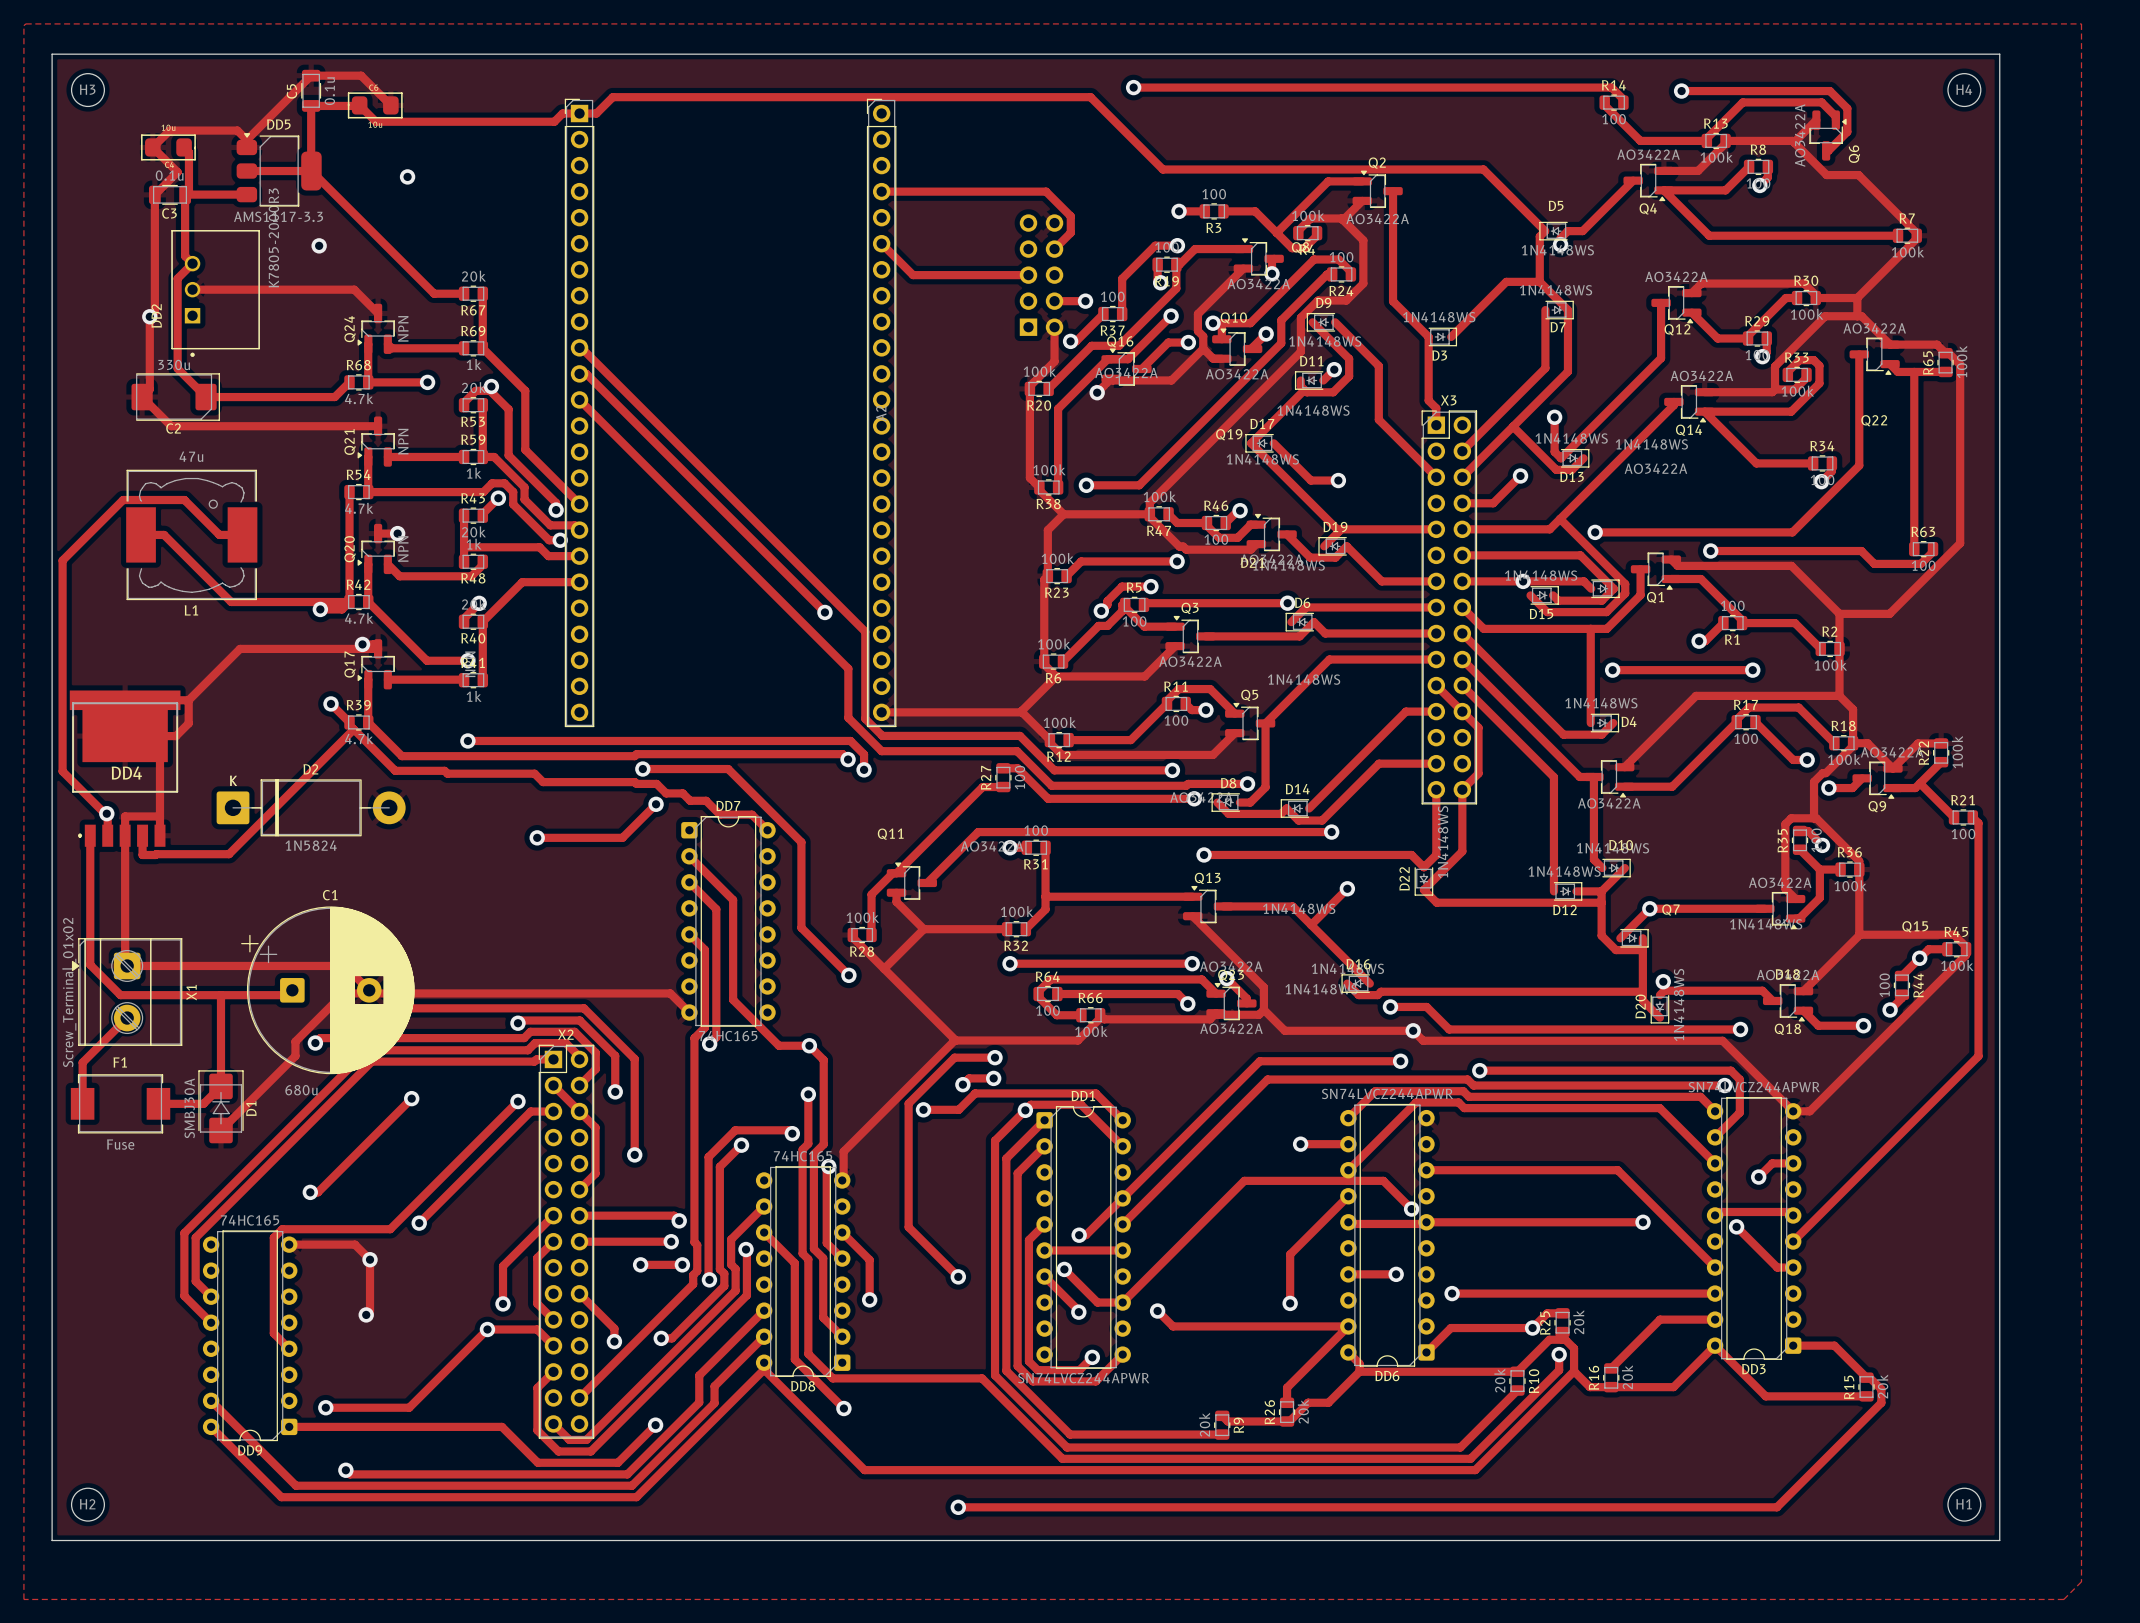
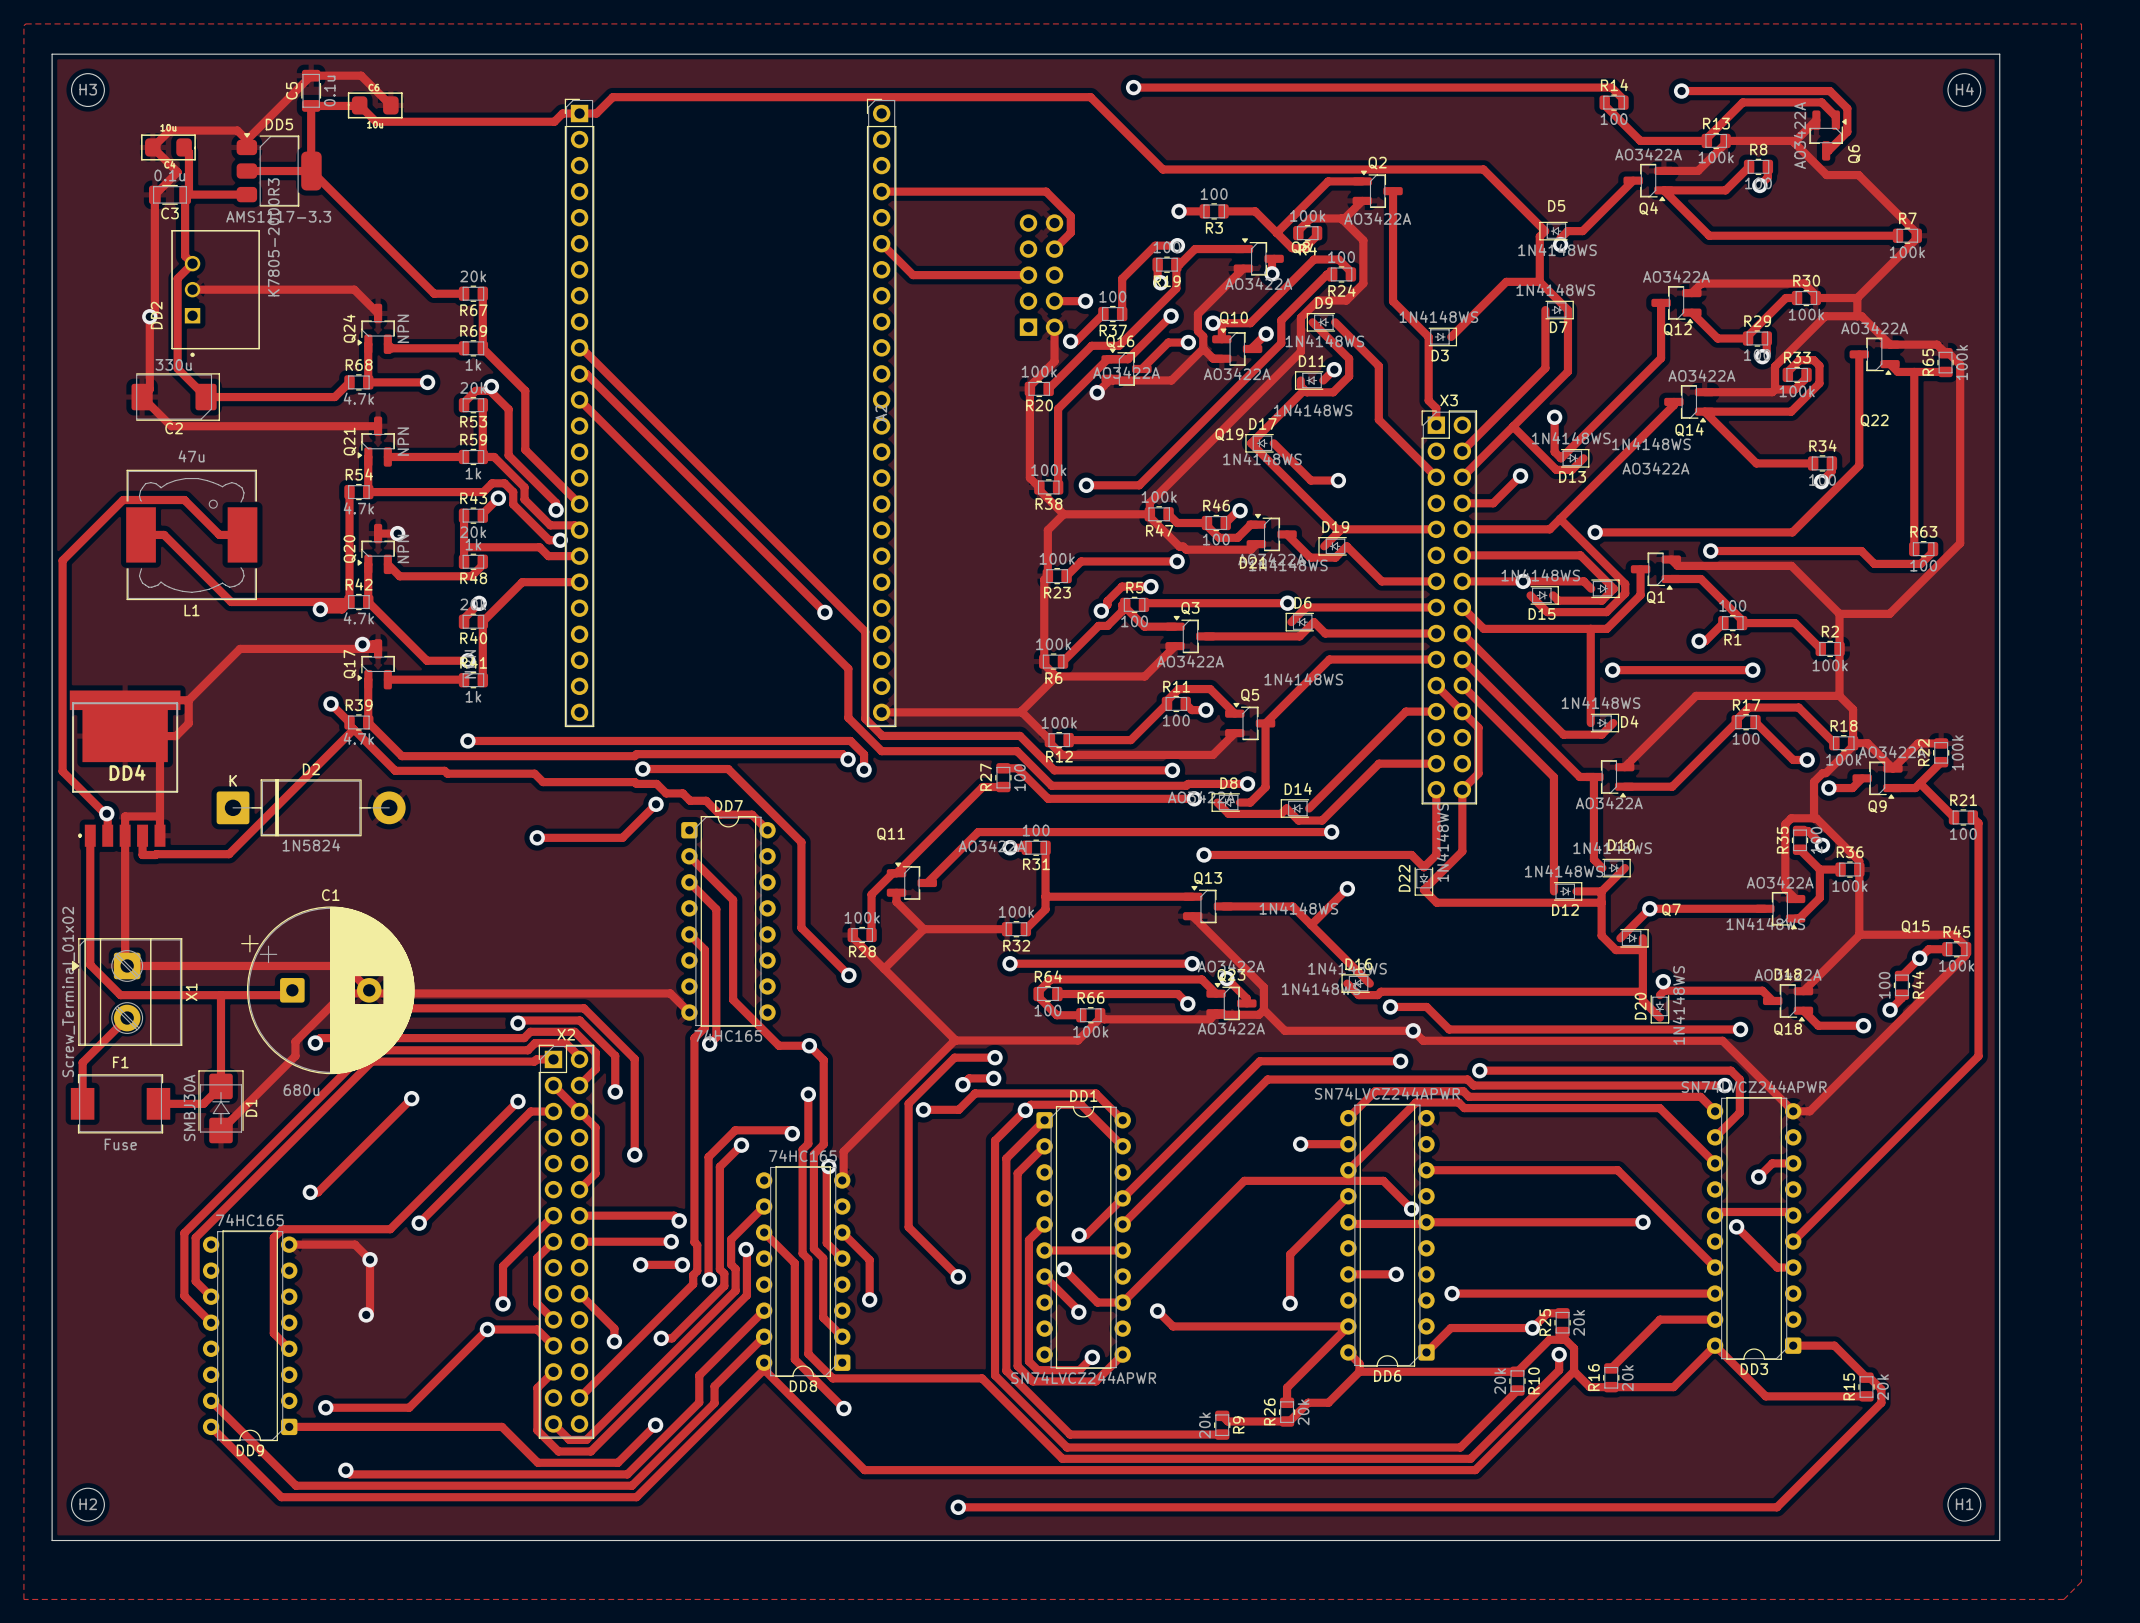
via: (407, 176) -> none
via: (319, 245) -> none

